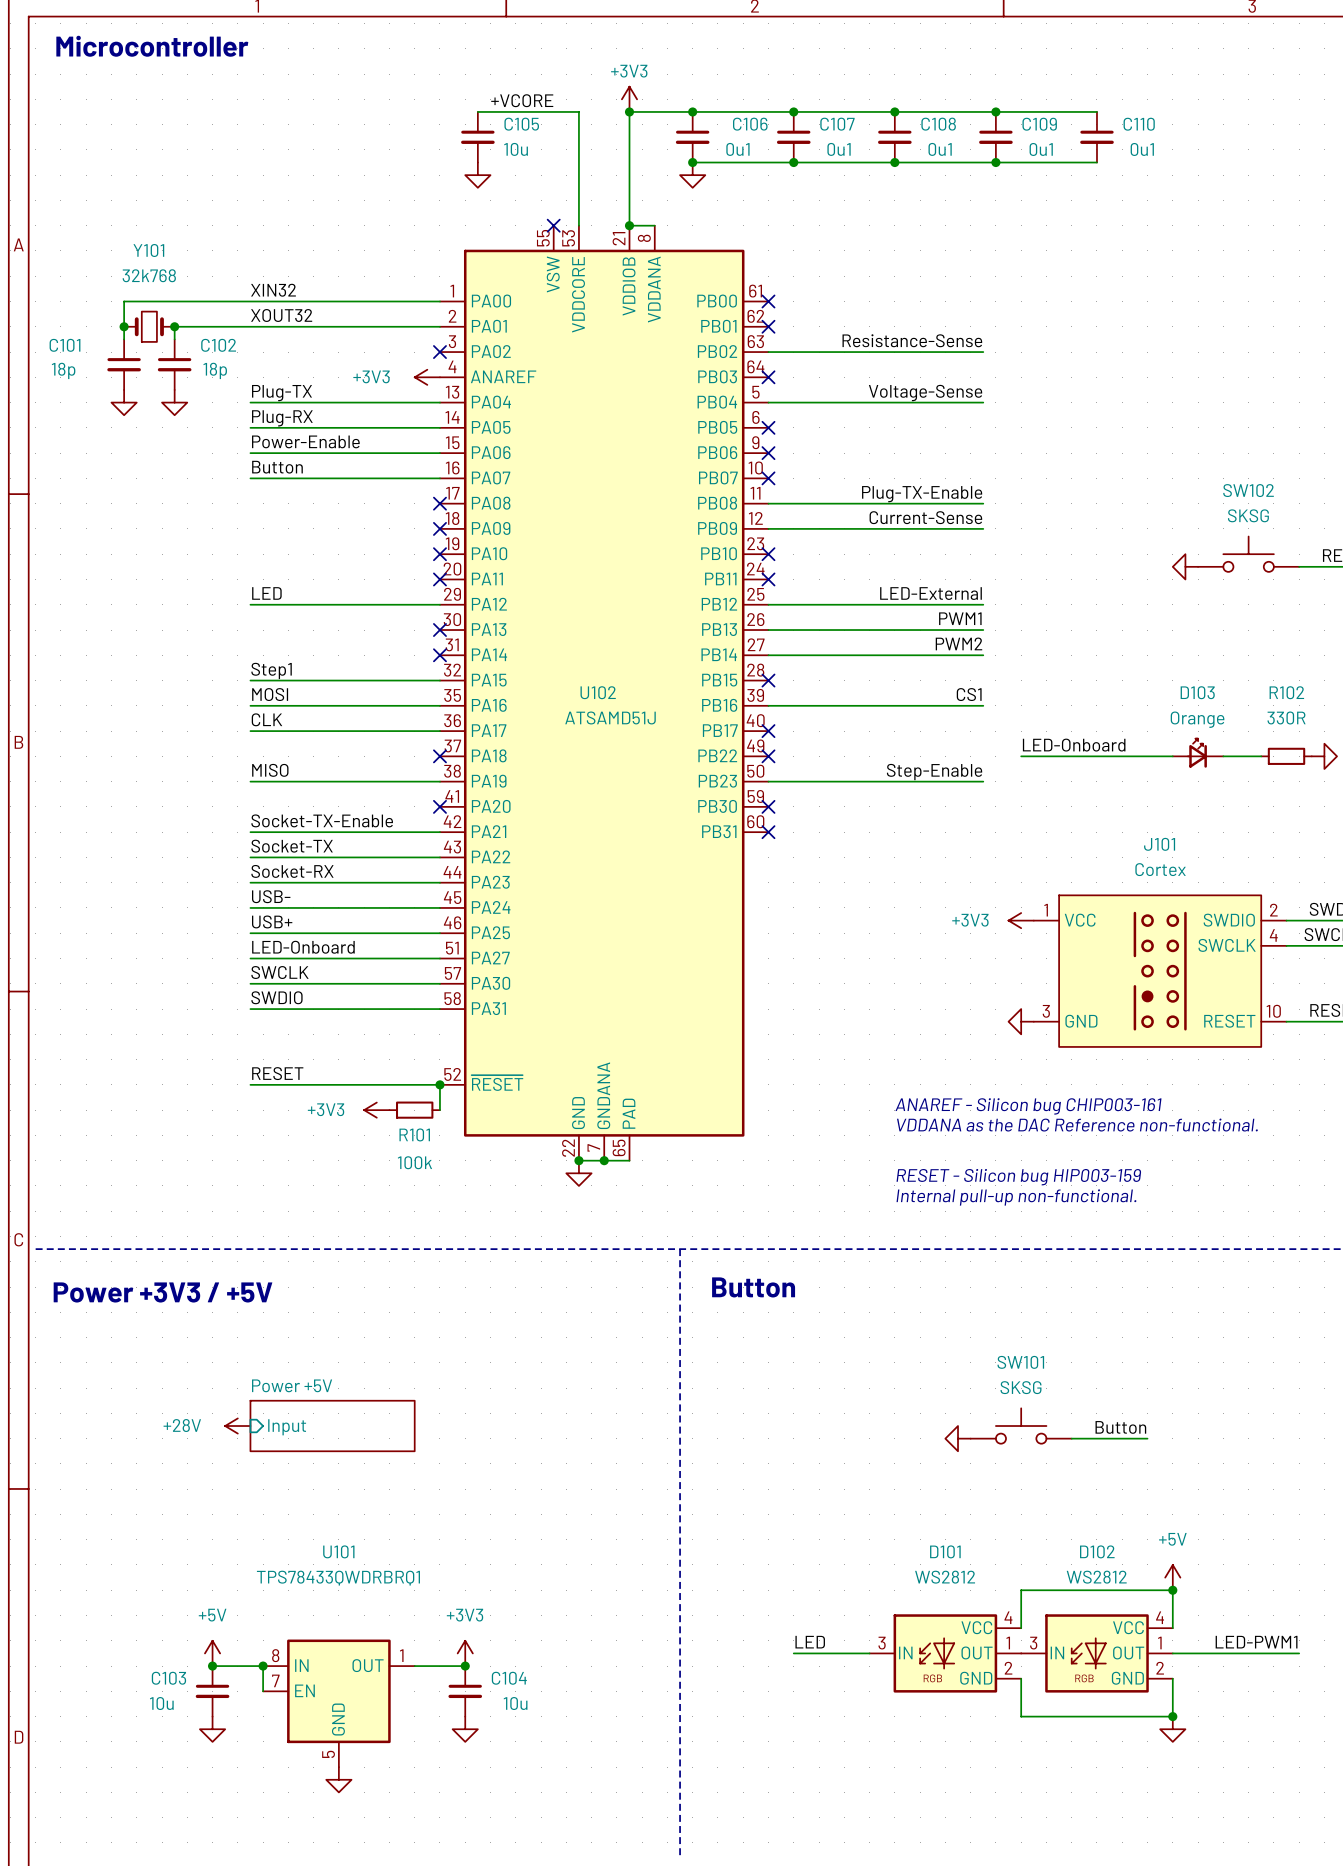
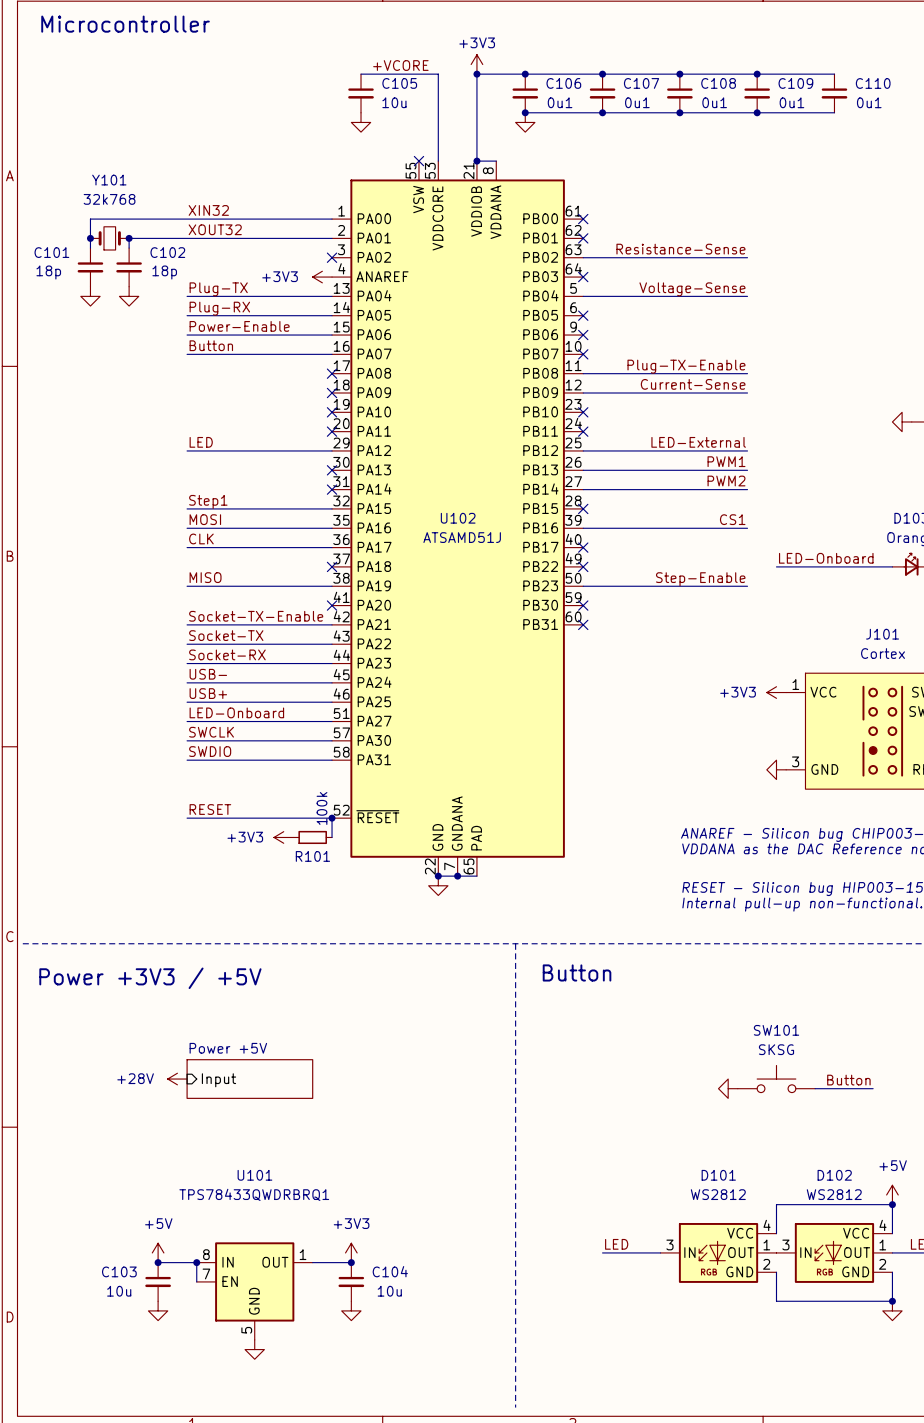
R101 value rotation: 0° (414, 1162) -> 90° counterclockwise (322, 808)
R101 value position: 100k (414, 1162) -> 100k (322, 808)

